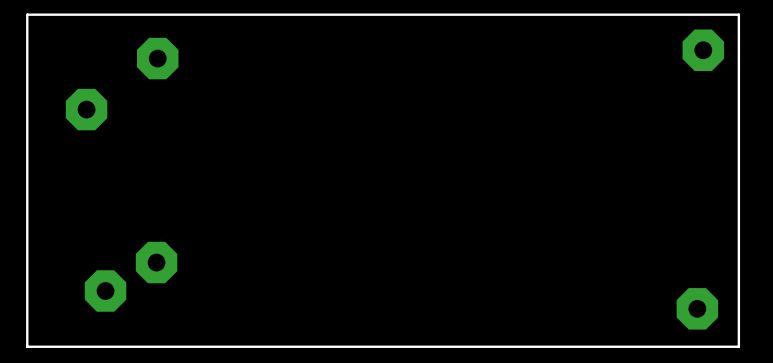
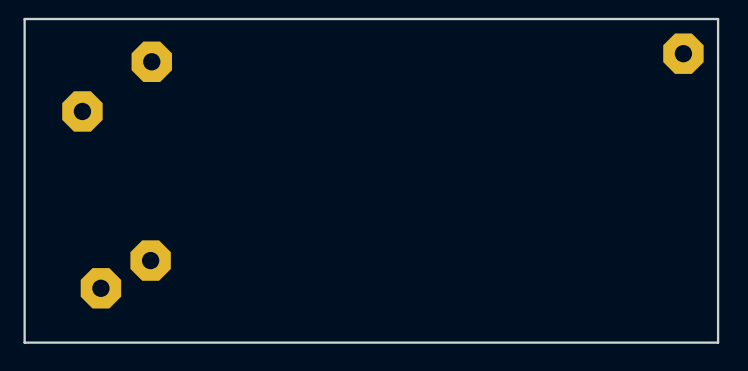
part: (697, 308) -> none

